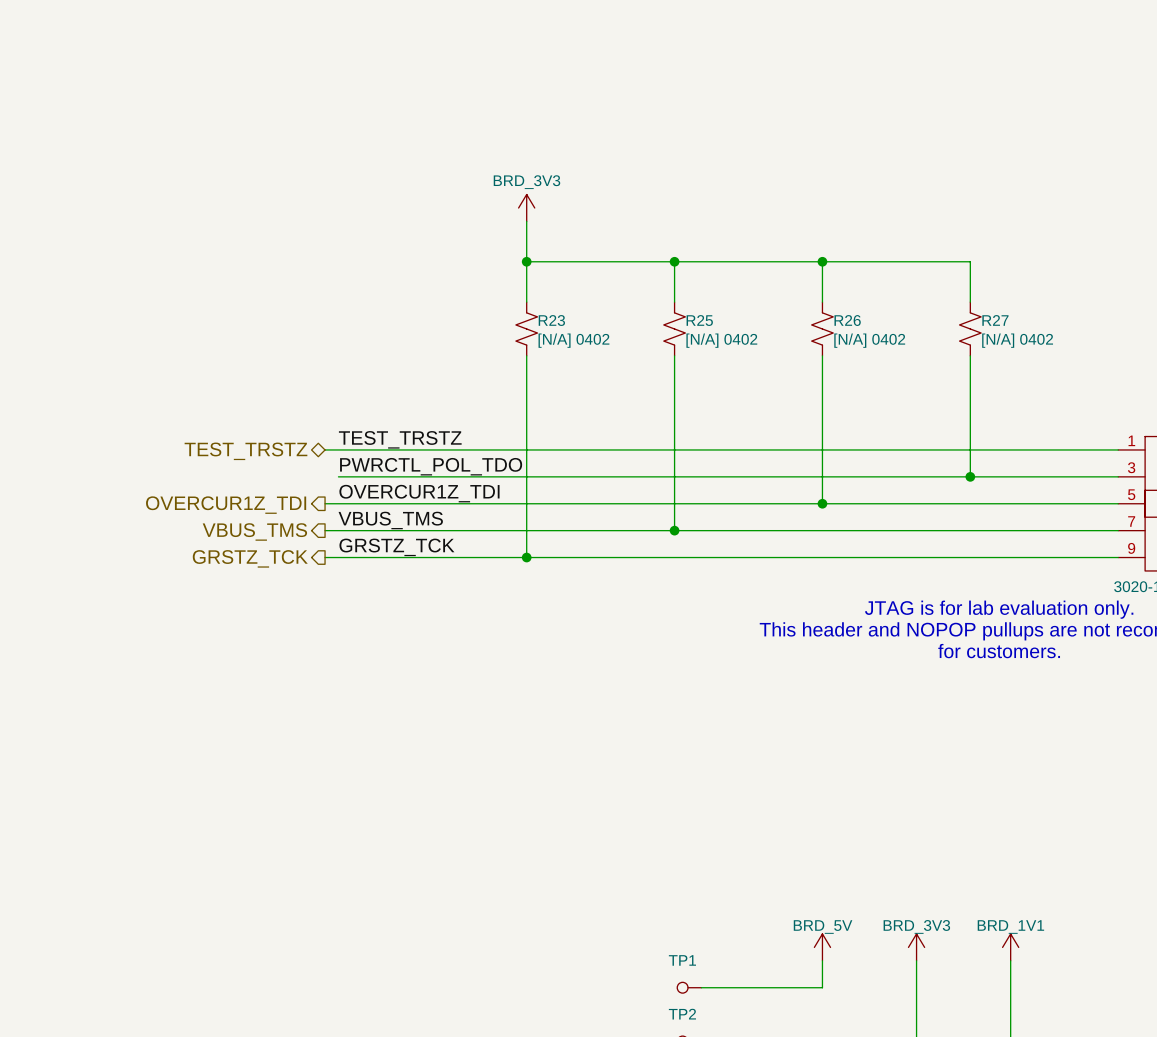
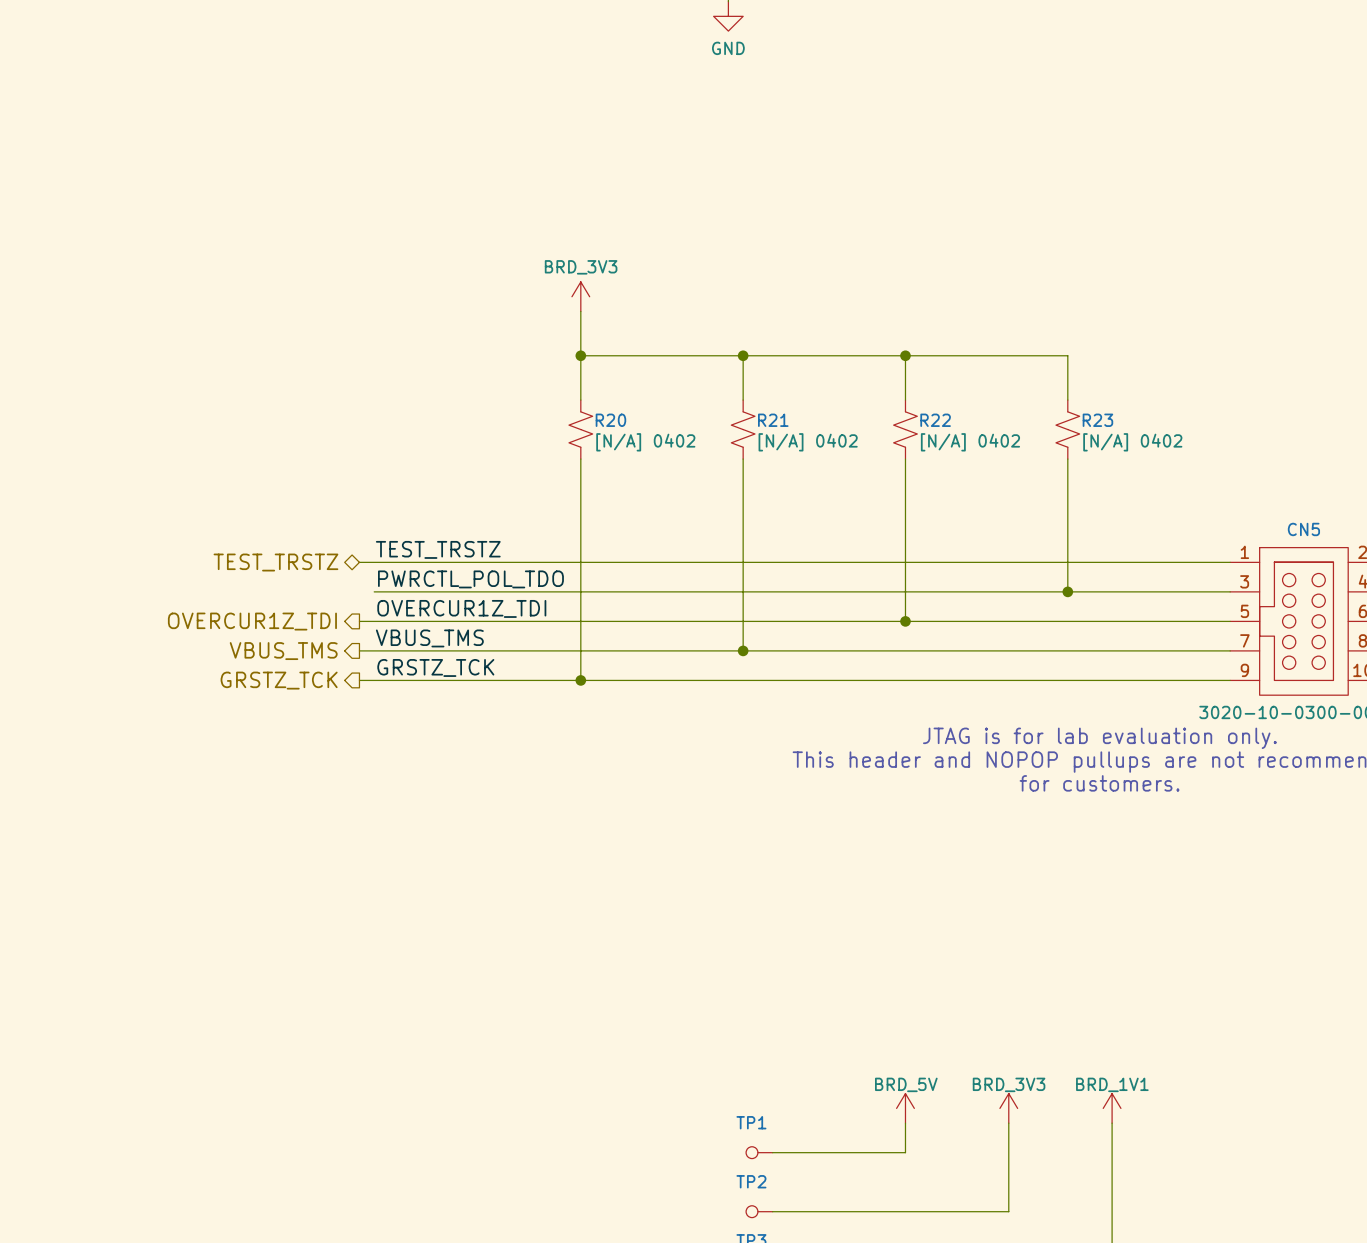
R23 name: R23 (551, 320) -> R20 (610, 420)
R25 name: R25 (699, 320) -> R21 (773, 420)
R26 name: R26 (847, 320) -> R22 (935, 420)
R27 name: R27 (995, 320) -> R23 (1097, 420)

